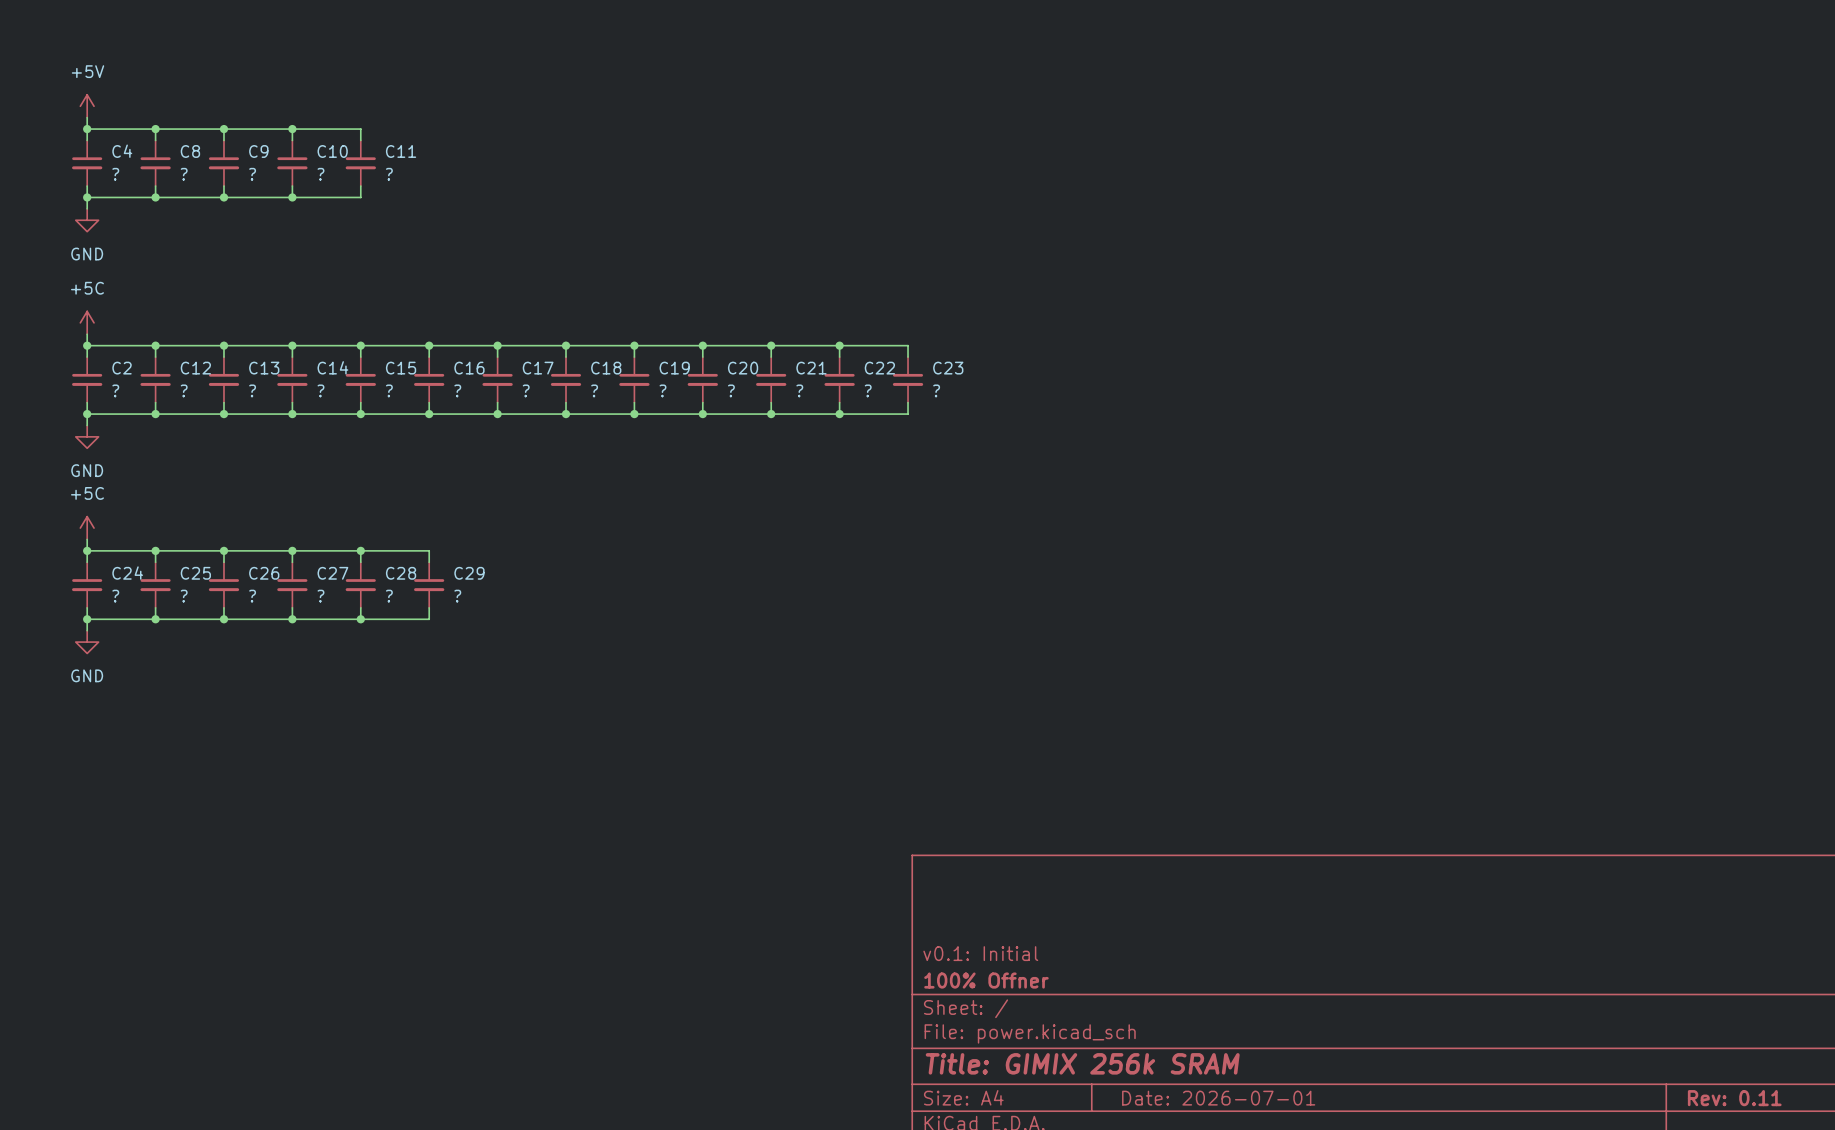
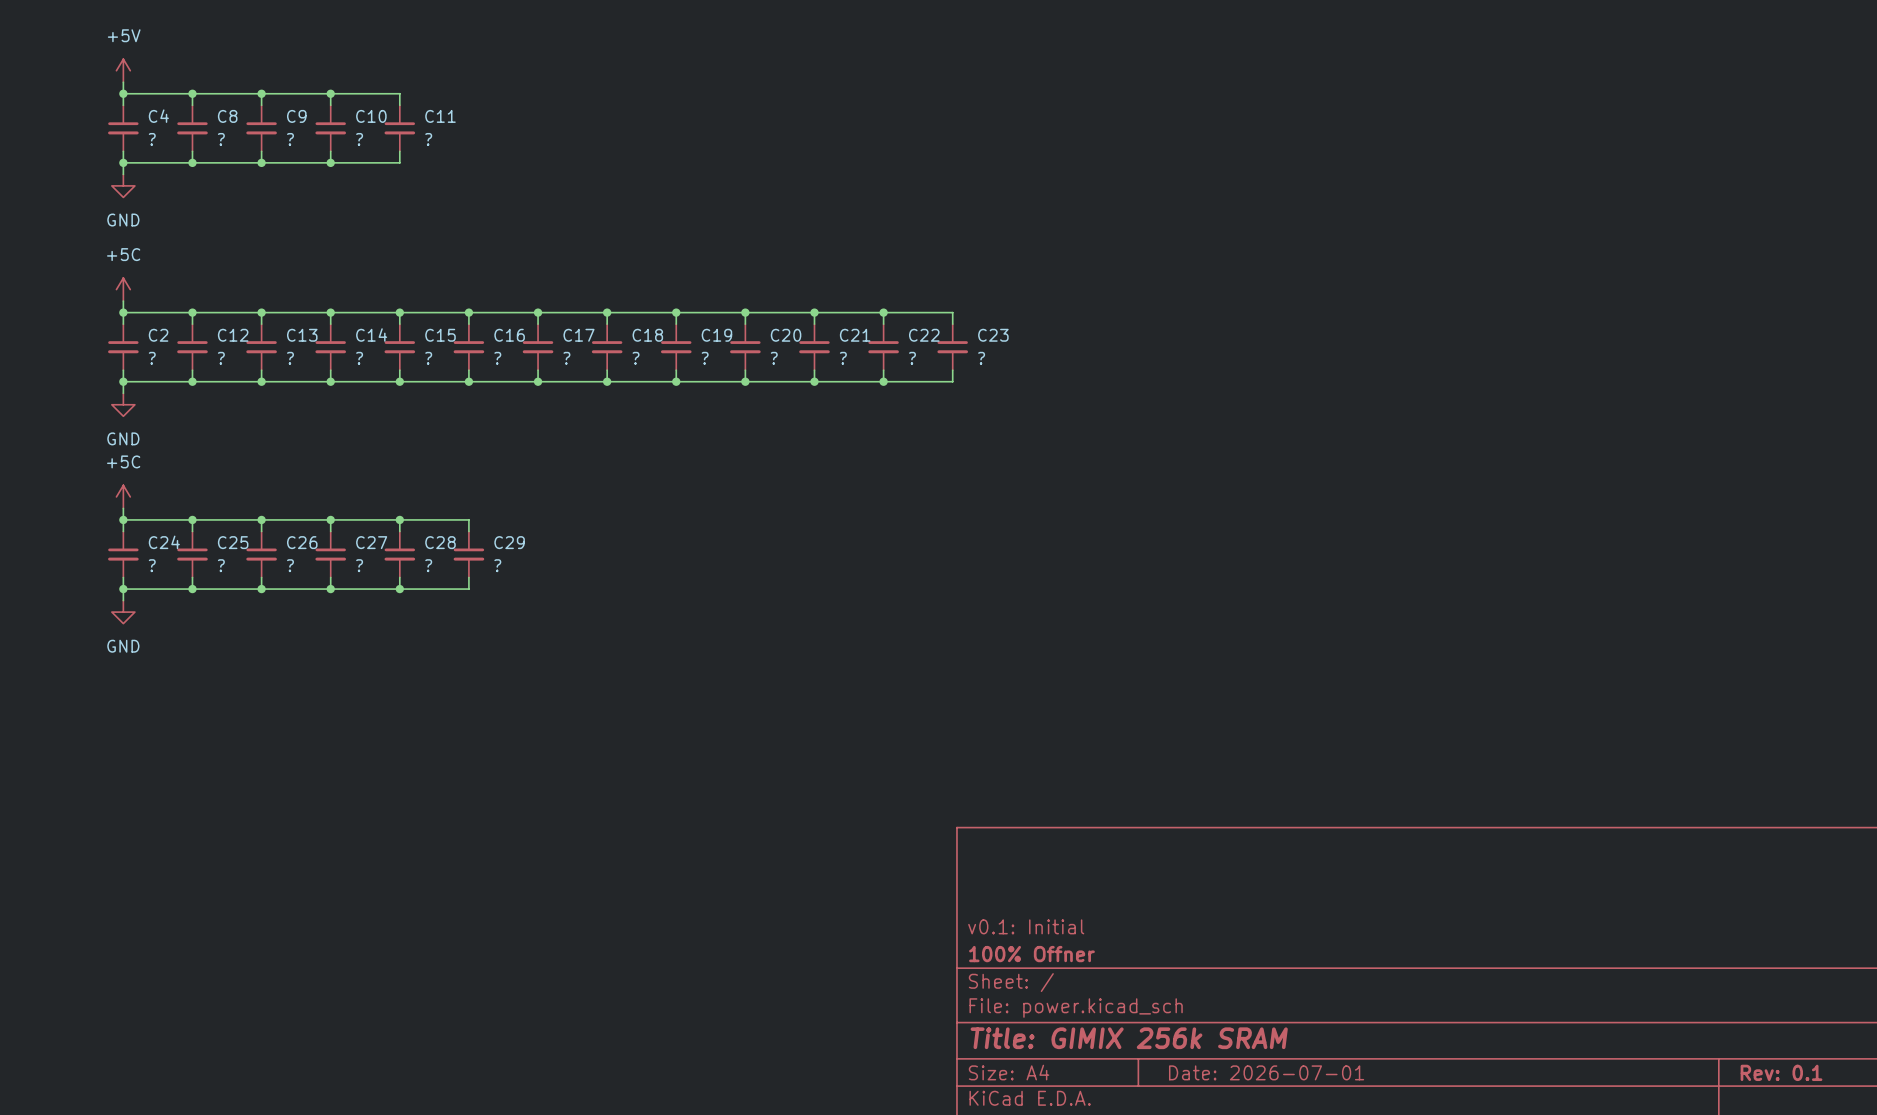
title block: Rev: 0.11 (1734, 1098) -> Rev: 0.1 (1781, 1072)

